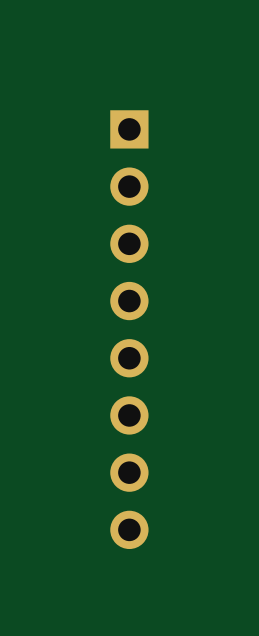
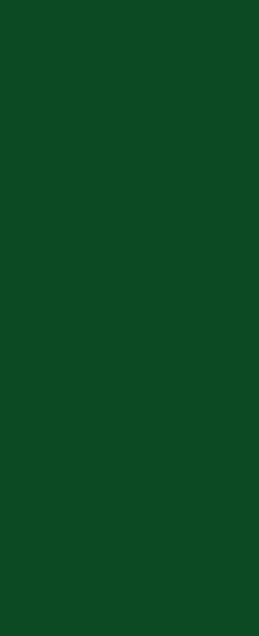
part: (129, 329) -> none

